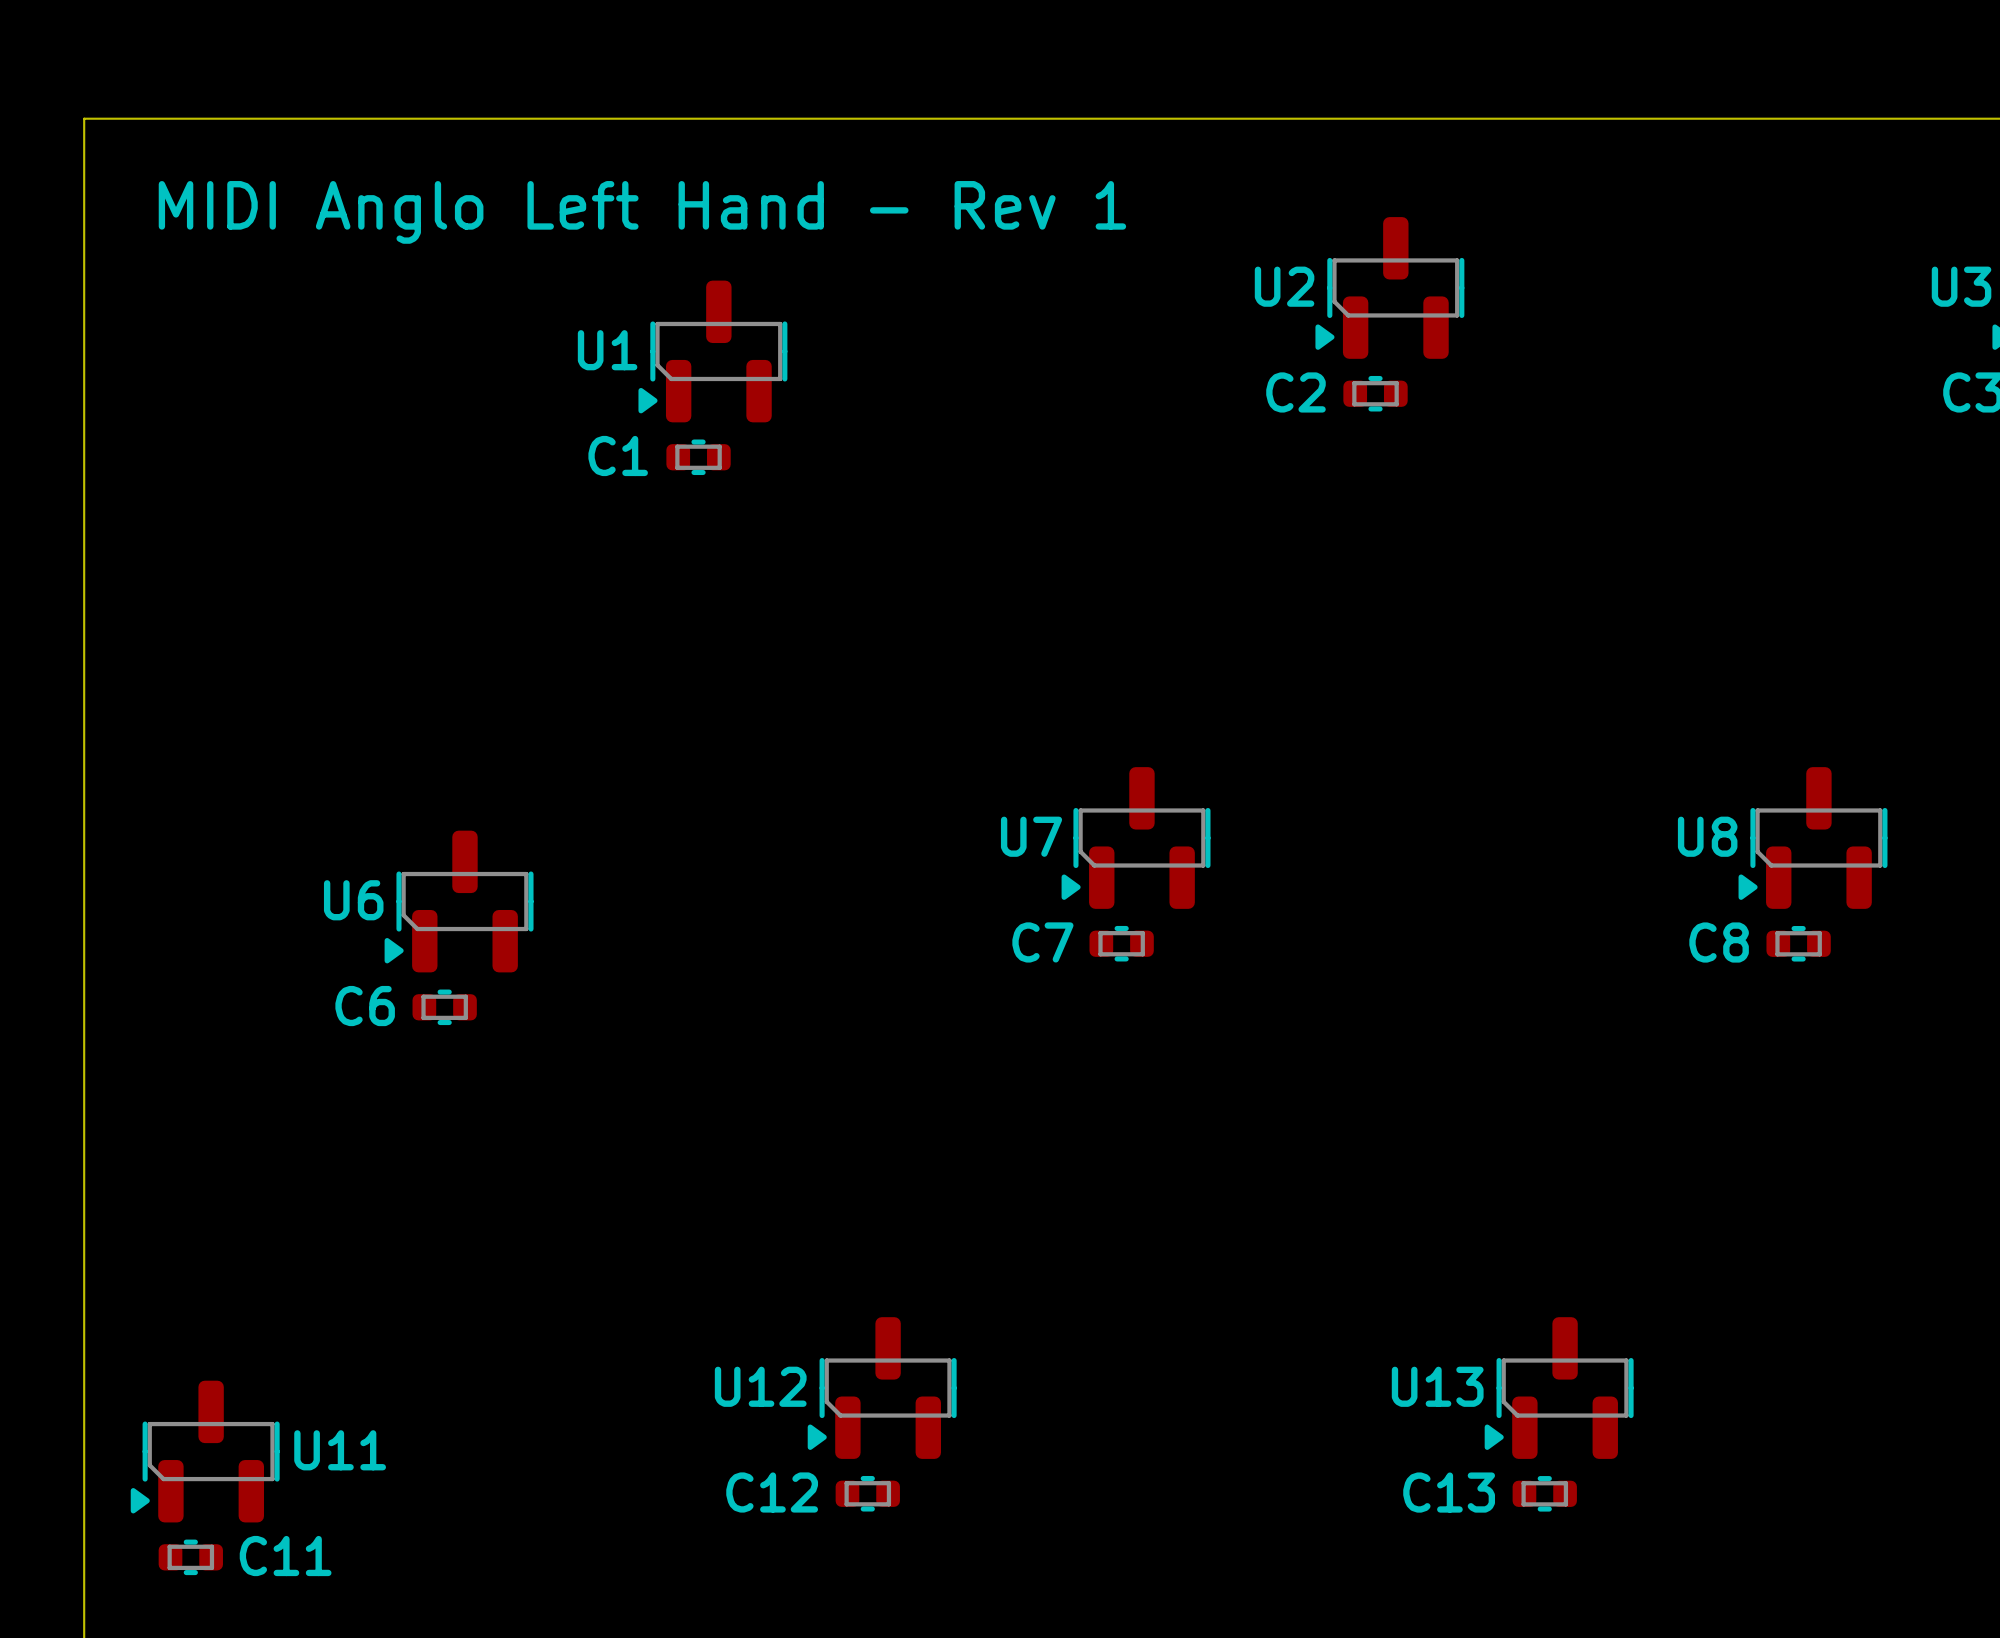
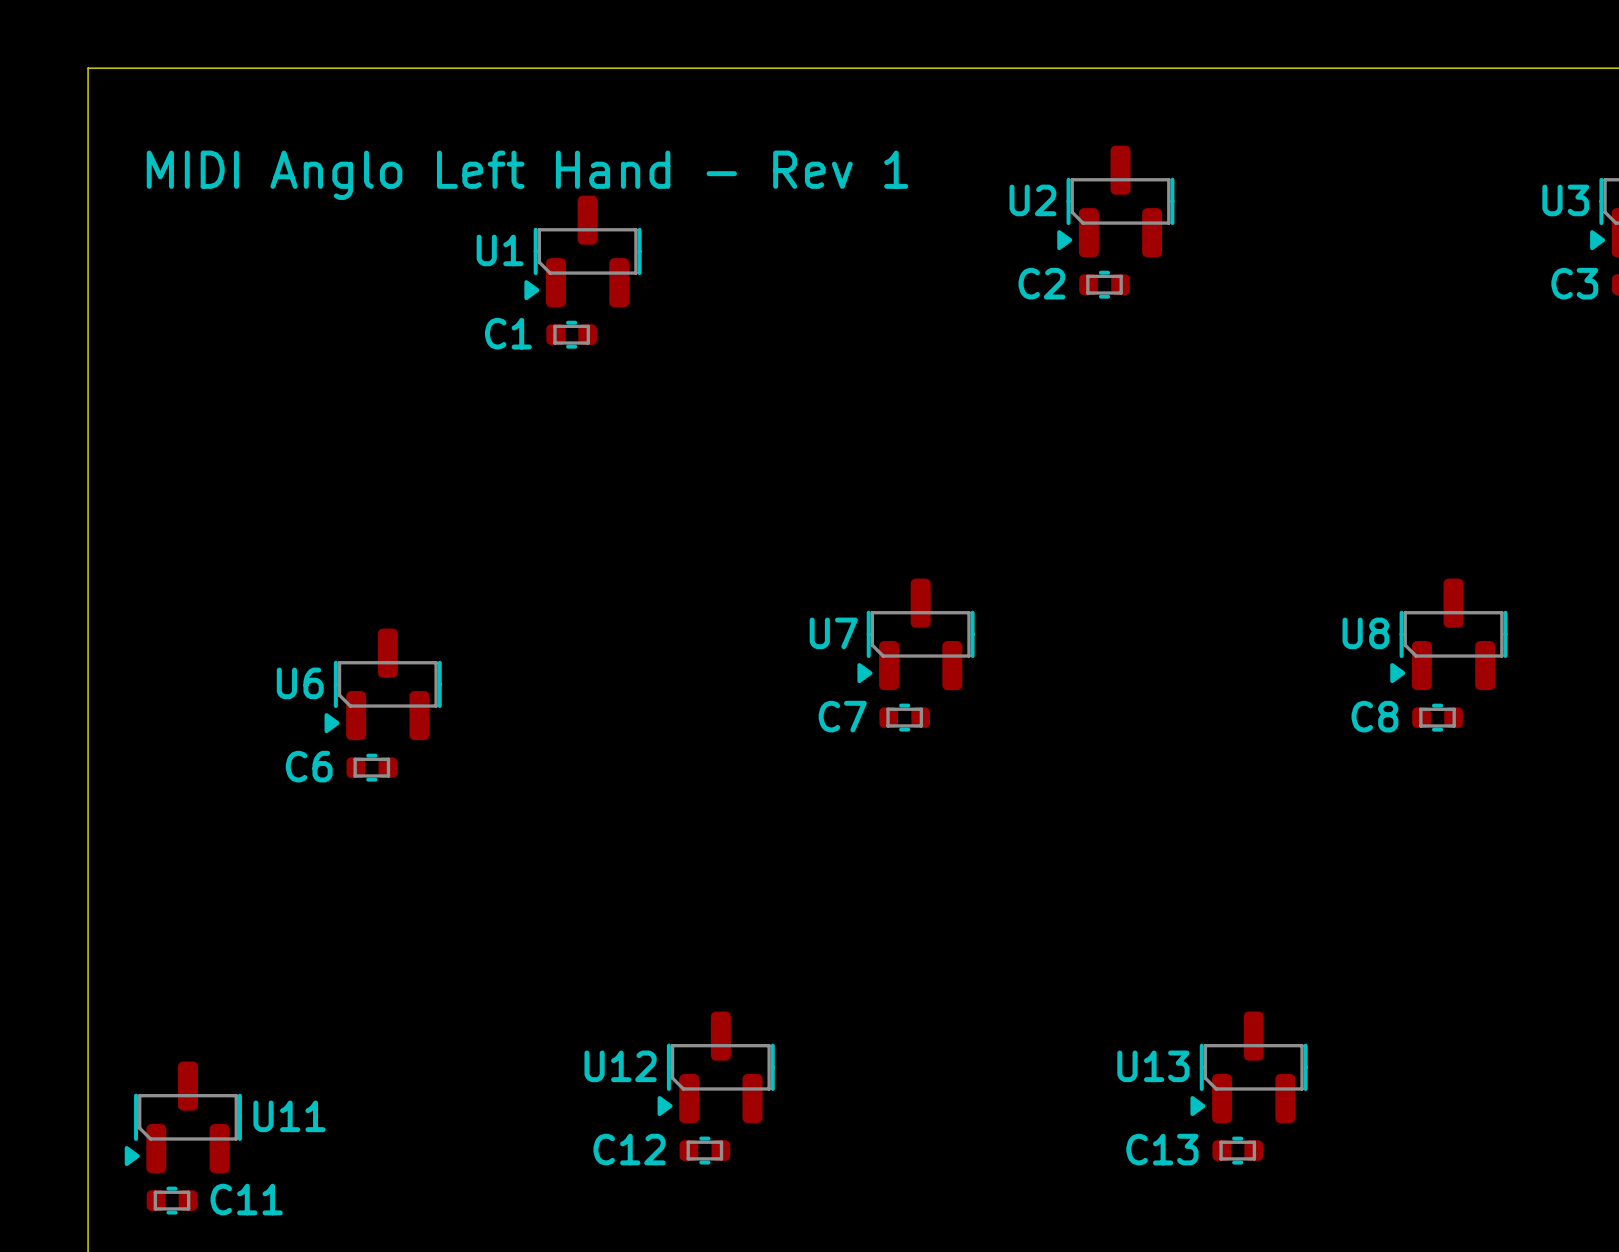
text position: MIDI Anglo Left Hand - Rev 1 (642, 212) -> MIDI Anglo Left Hand - Rev 1 (527, 175)

